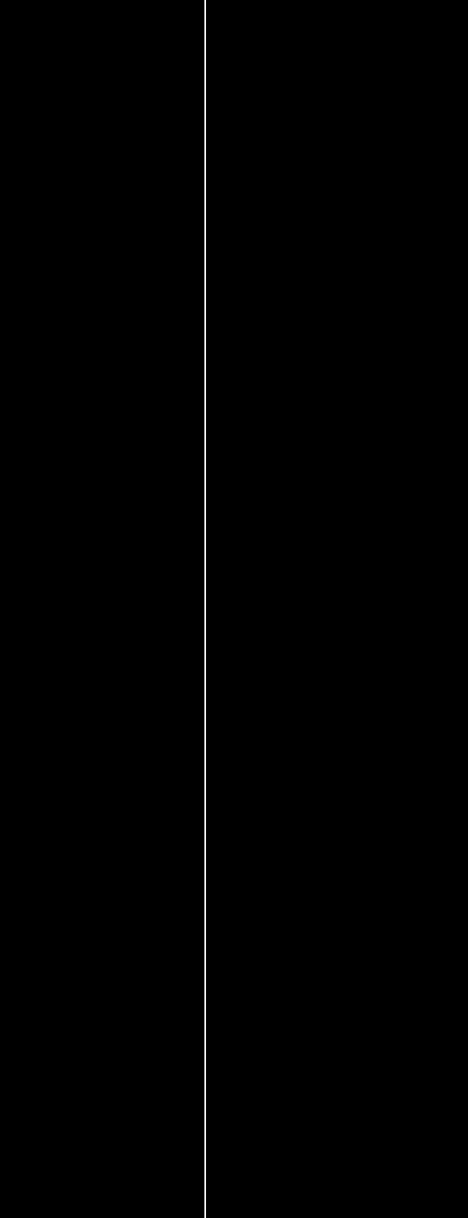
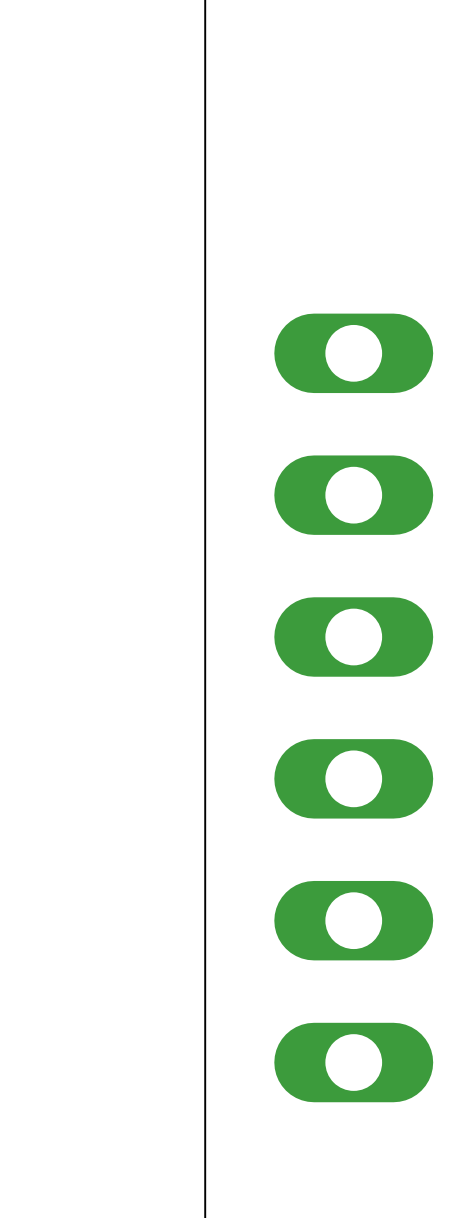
part: none -> (353, 707)

